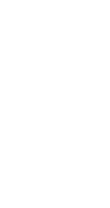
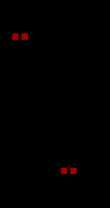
part: none -> (20, 36)
part: none -> (68, 170)

